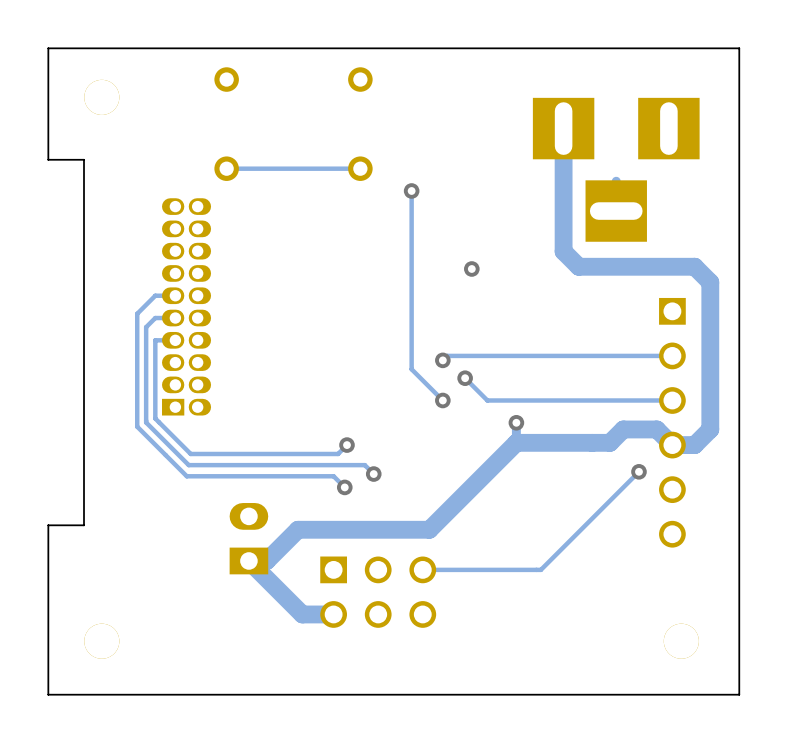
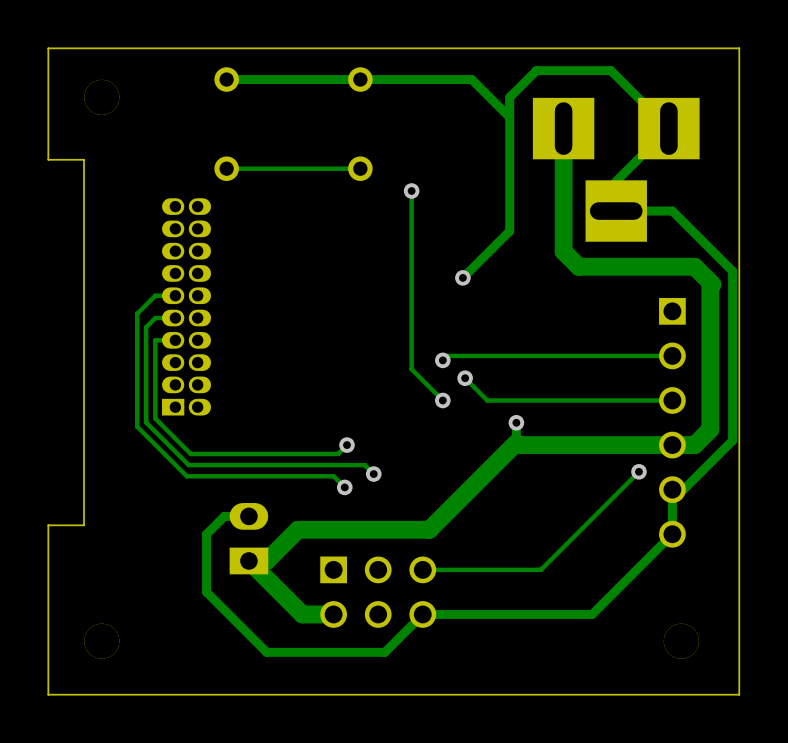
track: none -> (226, 79) (471, 79) (509, 117)
track: none -> (616, 181) (668, 128) (610, 70) (536, 70) (509, 97) (509, 231) (462, 277)
track: none -> (616, 211) (672, 211) (732, 271) (732, 440) (683, 489) (672, 489) (672, 534) (592, 614) (422, 614) (384, 652) (266, 652) (206, 592) (206, 534) (224, 516) (248, 516)
via position: (471, 268) -> (462, 277)
track: (516, 442) (610, 442) (623, 429) (656, 429) (672, 445) -> (516, 445) (672, 445)

